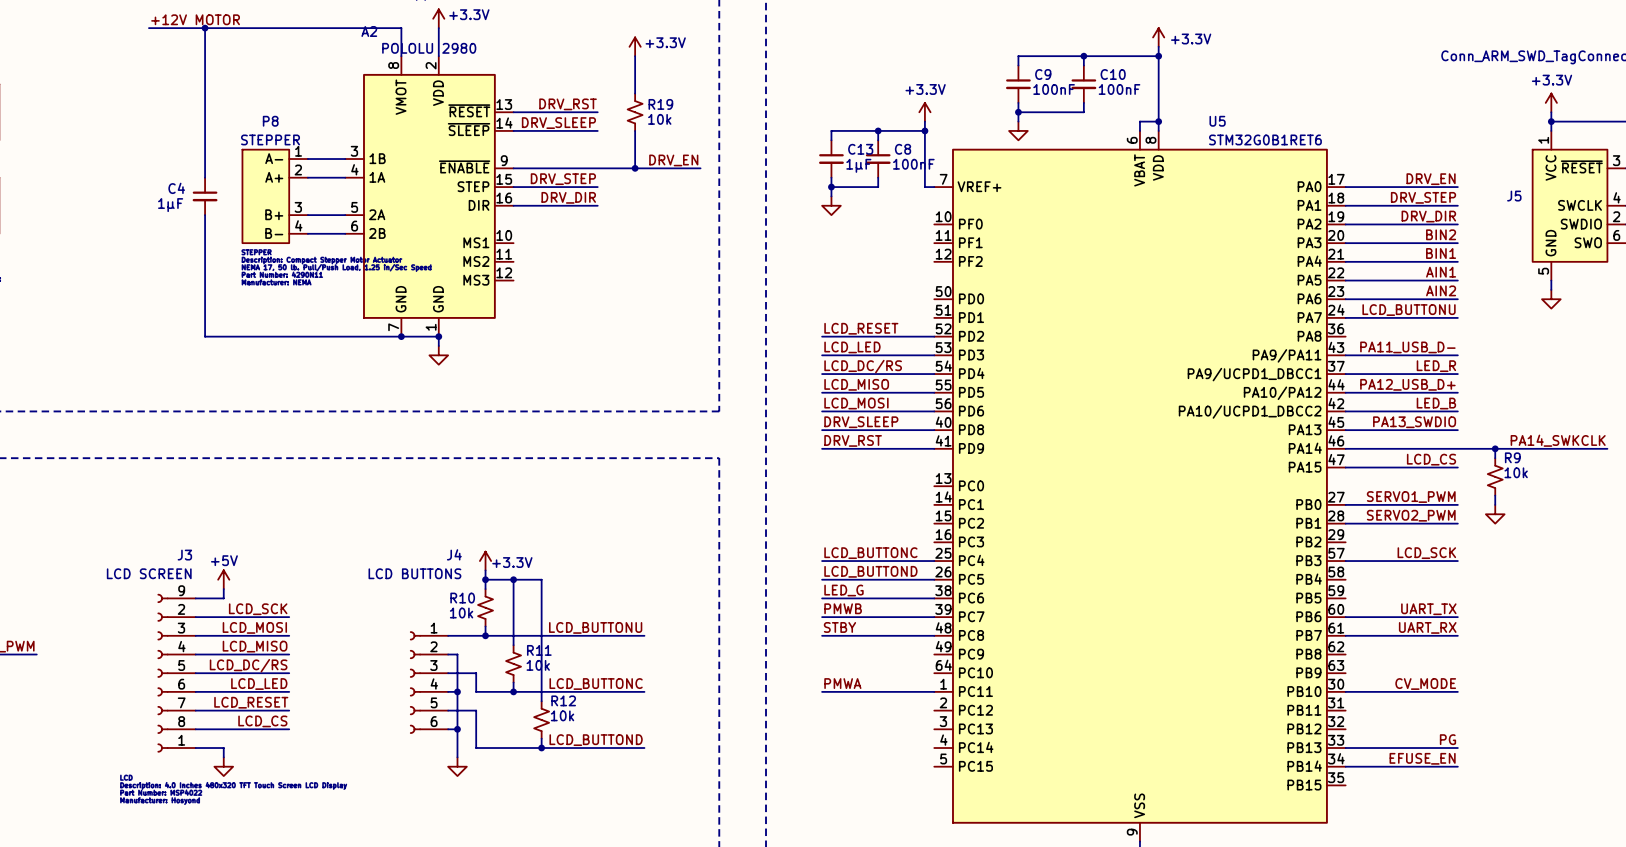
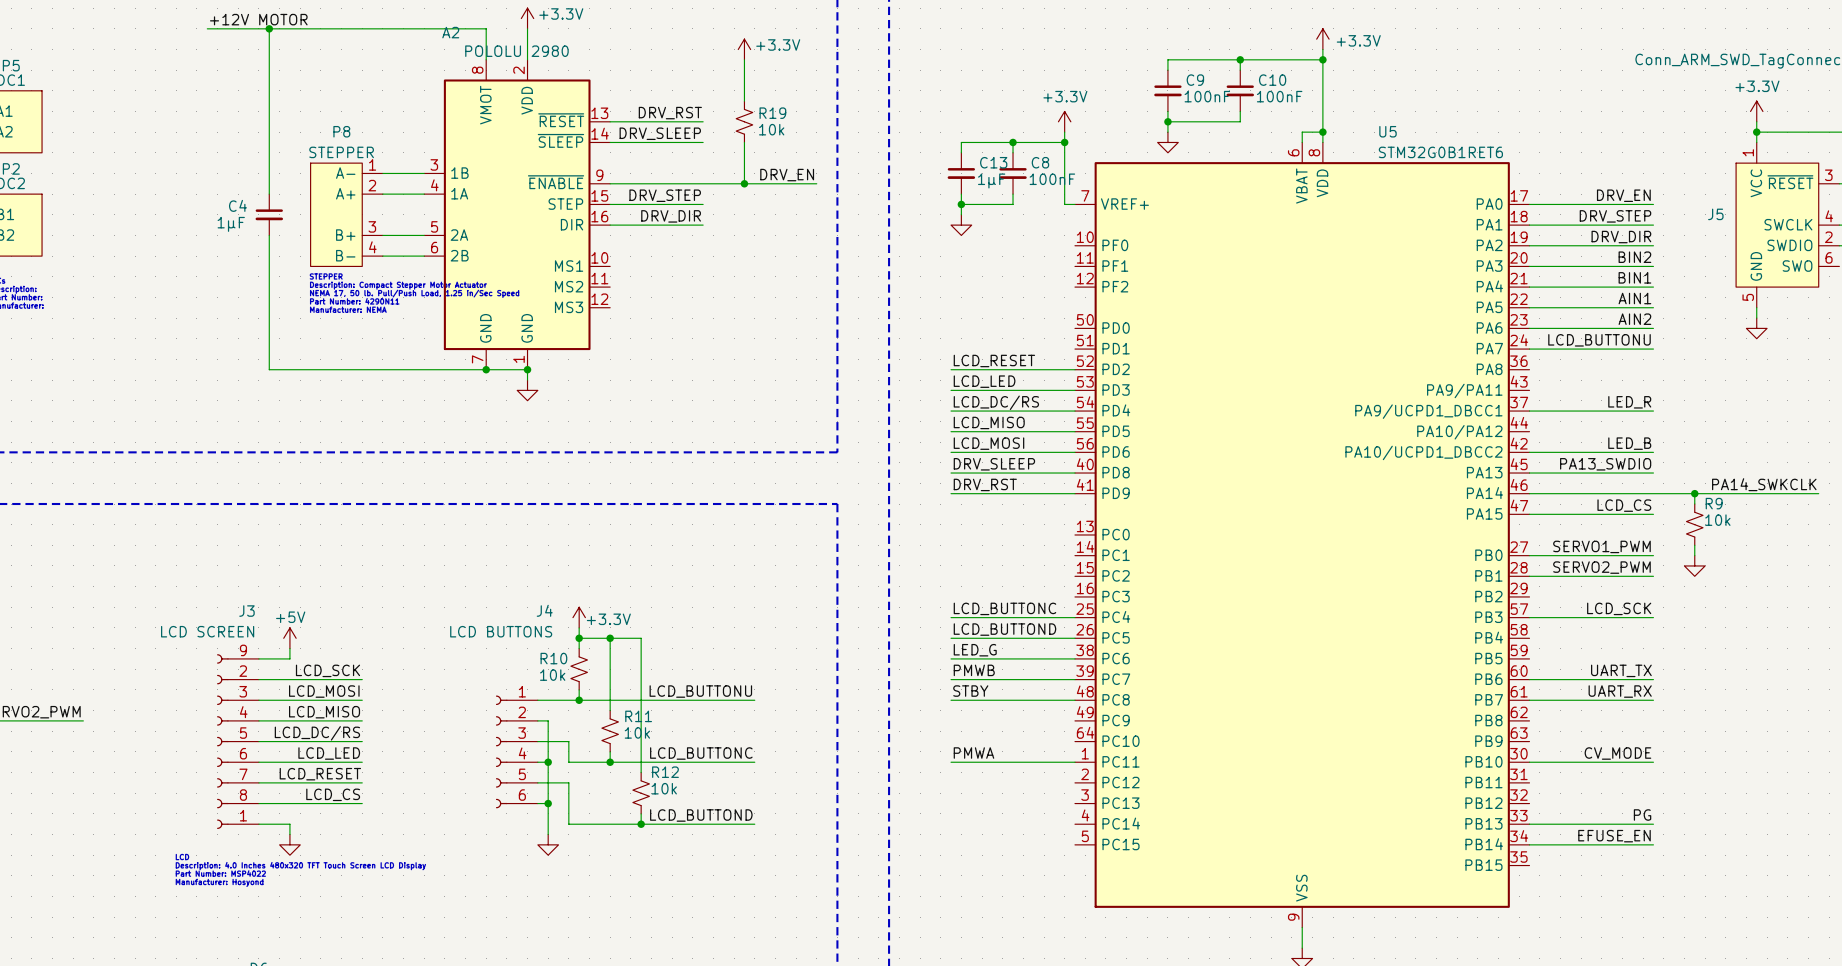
label: PA11_USB_D- (1407, 347) -> none
wire: (1345, 355) (1457, 355) -> none
label: PA12_USB_D+ (1407, 384) -> none
wire: (1345, 392) (1457, 392) -> none

